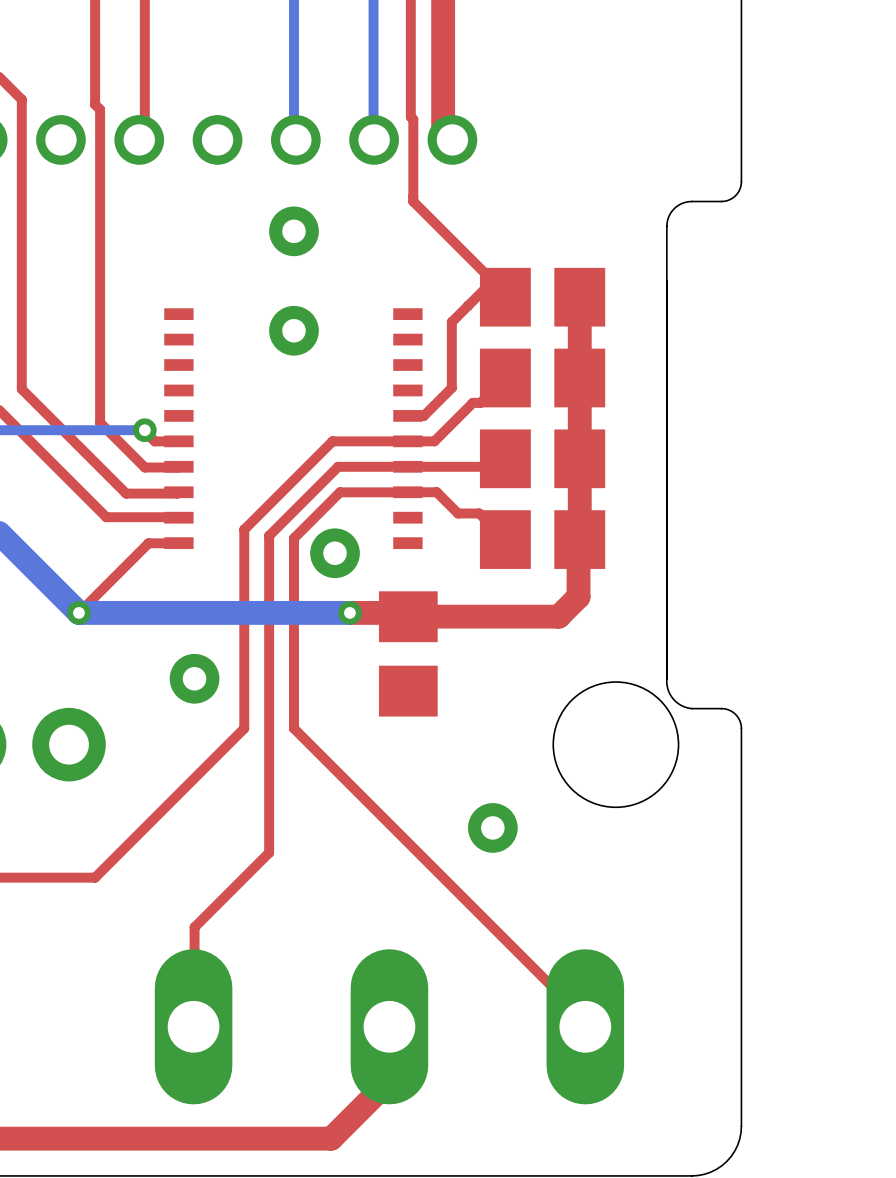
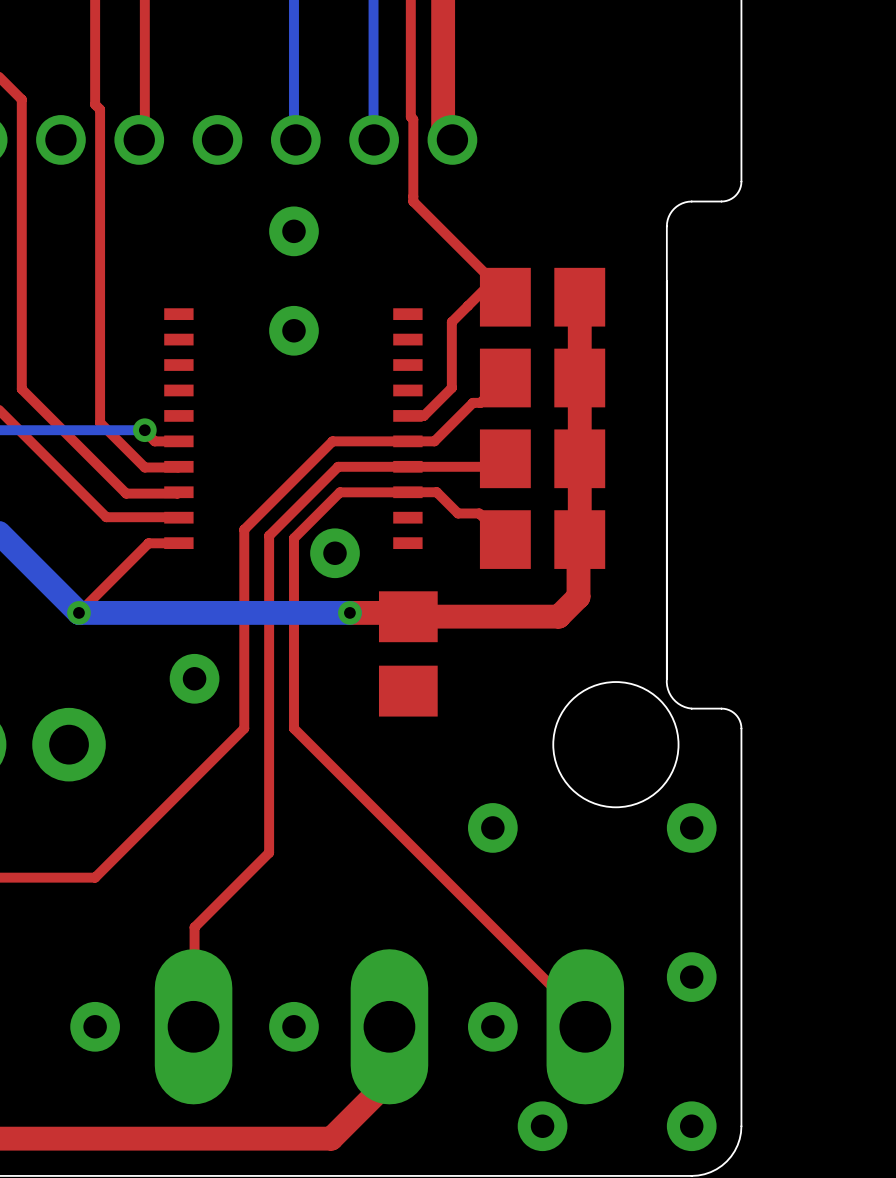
via: none -> (691, 827)
via: none -> (691, 977)
via: none -> (95, 1026)
via: none -> (293, 1026)
via: none -> (492, 1026)
via: none -> (542, 1126)
via: none -> (691, 1126)

